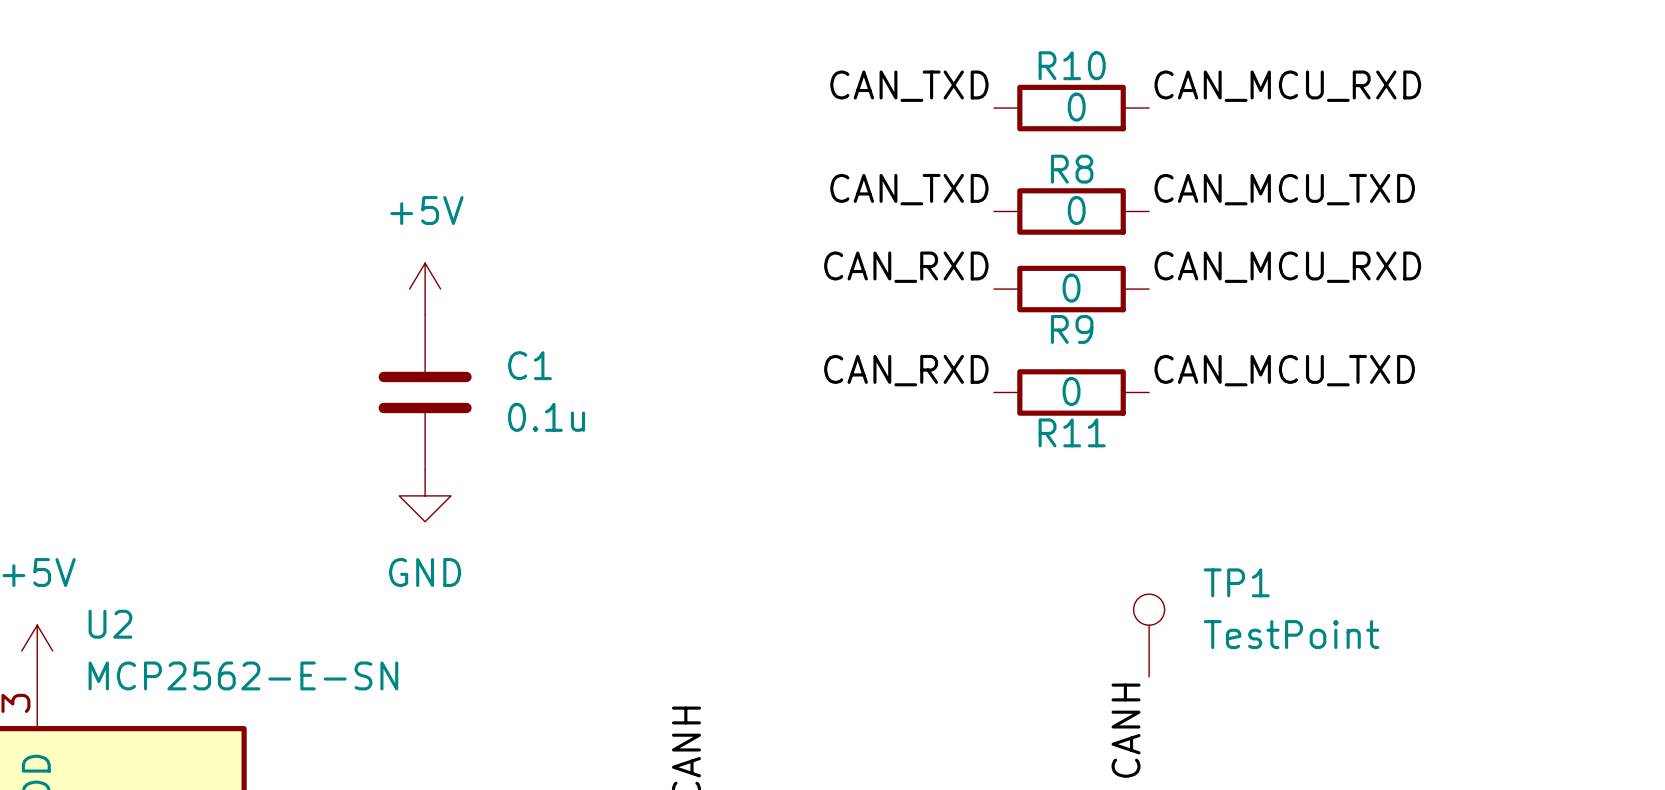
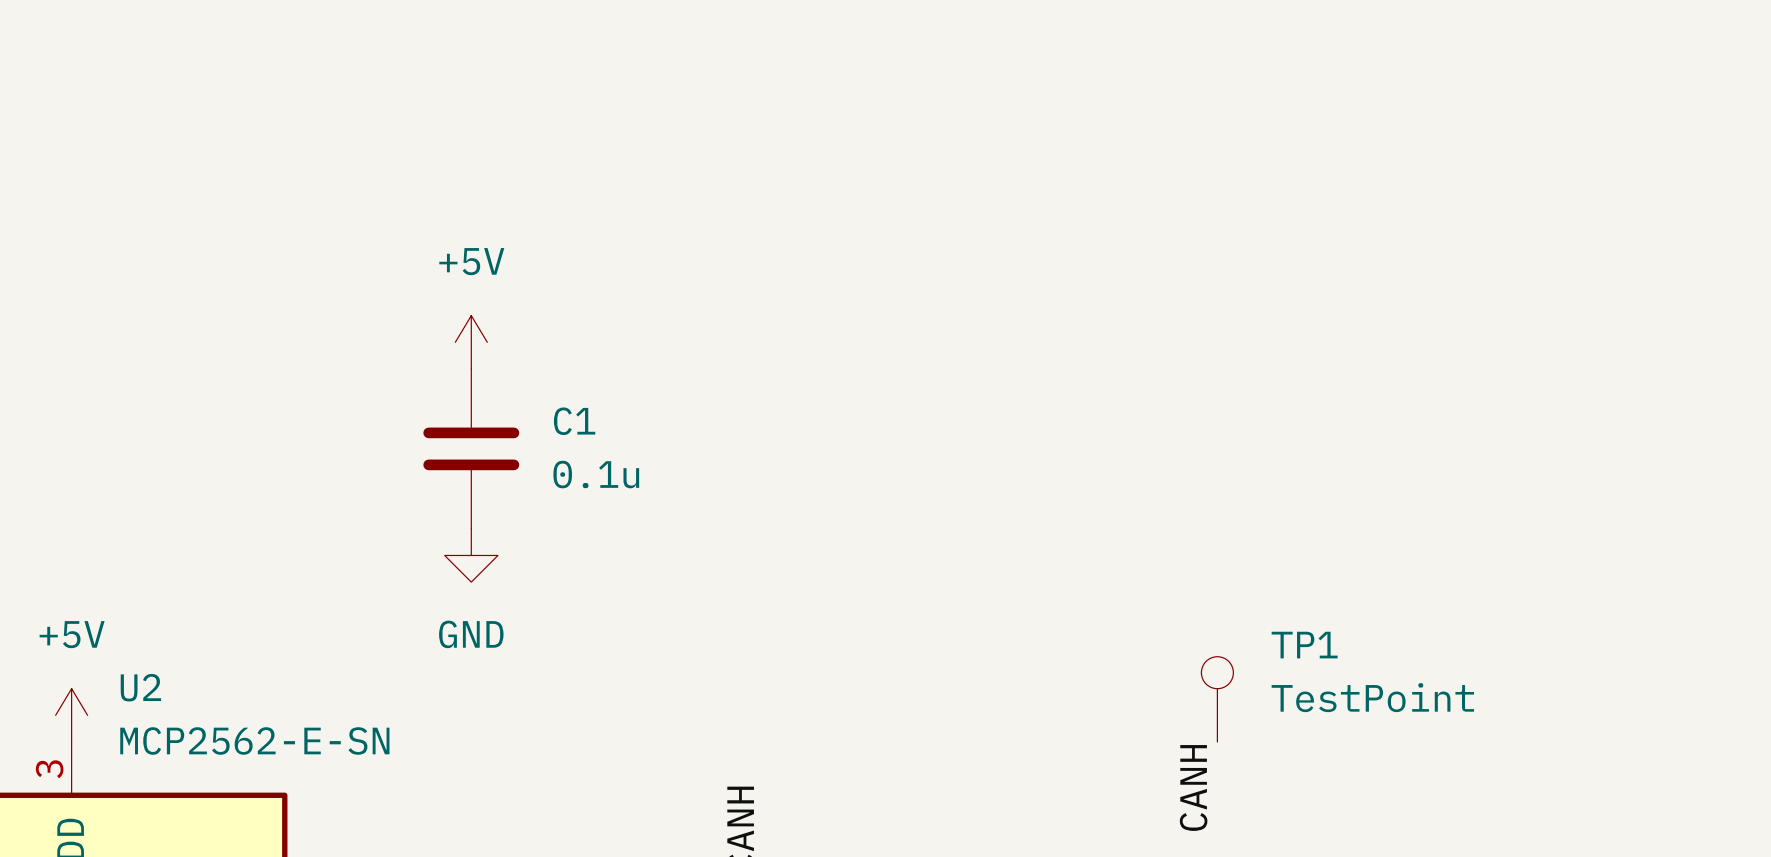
label: CAN_TXD (909, 86) -> none
label: CAN_MCU_RXD (1287, 86) -> none
R10: 0 (1071, 108) -> none
label: CAN_TXD (909, 189) -> none
label: CAN_MCU_TXD (1284, 189) -> none
R8: 0 (1071, 211) -> none
label: CAN_RXD (906, 267) -> none
label: CAN_MCU_RXD (1287, 267) -> none
R9: 0 (1071, 289) -> none
label: CAN_RXD (906, 370) -> none
label: CAN_MCU_TXD (1284, 370) -> none
R11: 0 (1071, 392) -> none

